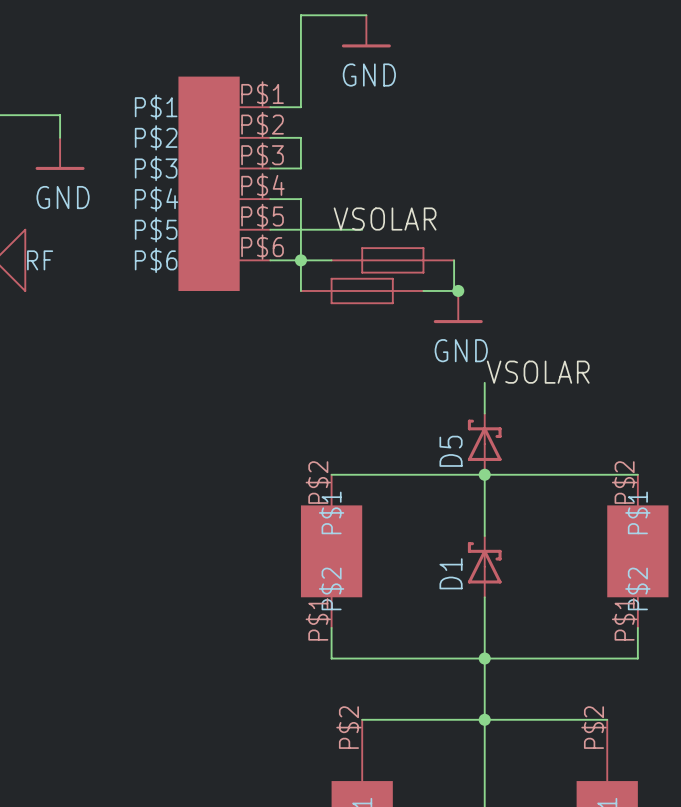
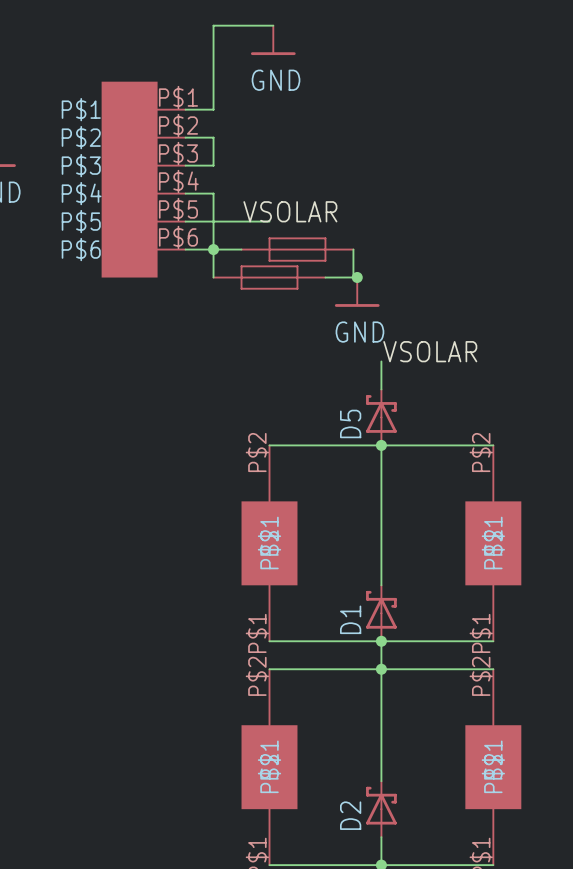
wire: (331, 474) (362, 474) -> none
wire: (607, 474) (637, 474) -> none
part: (331, 551) -> none
part: (637, 551) -> none
D1 position: (484, 566) -> (381, 613)
part: none -> (269, 543)
part: none -> (493, 543)
wire: (331, 627) (331, 658) (637, 658) (637, 627) -> none
junction position: (484, 658) -> (381, 641)
wire: none -> (269, 641) (493, 641)

